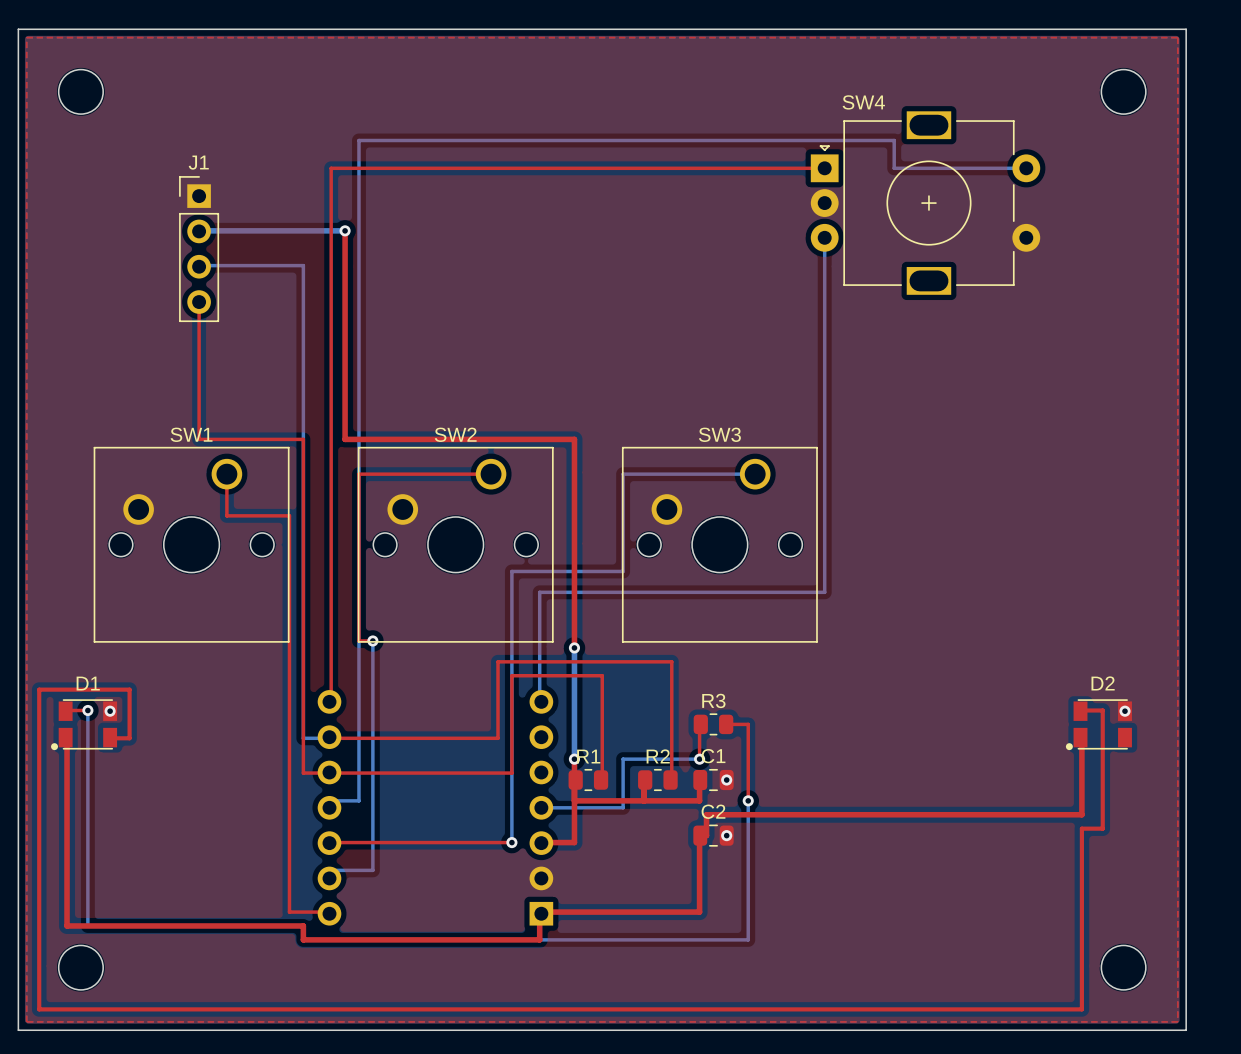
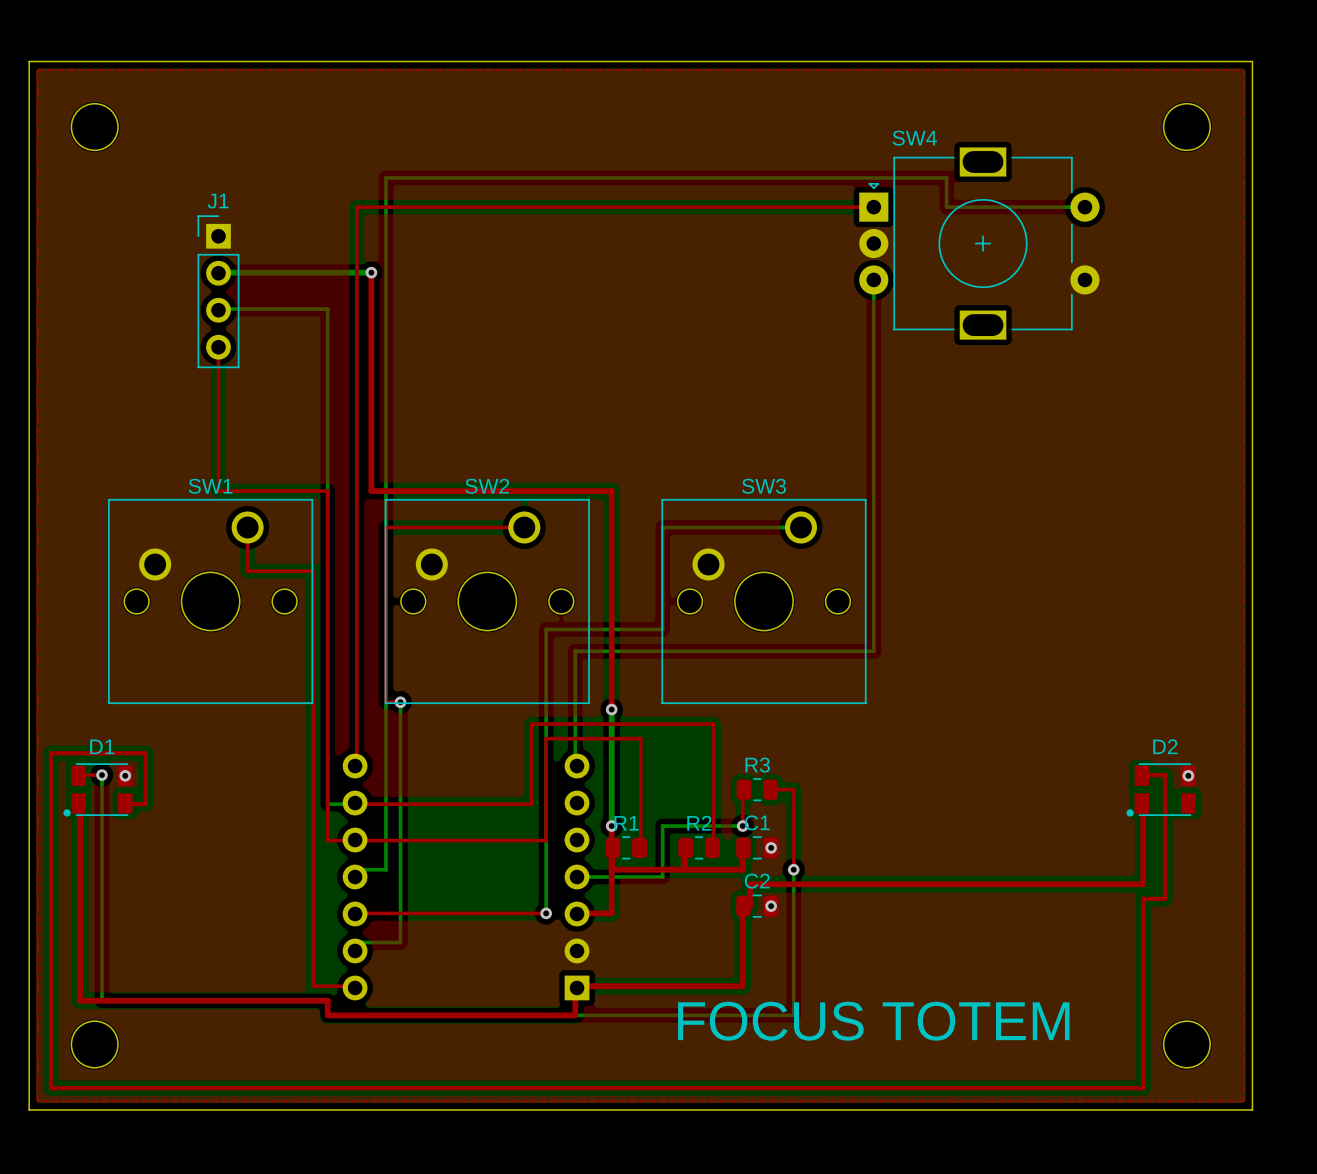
text: none -> FOCUS TOTEM (873, 1021)

